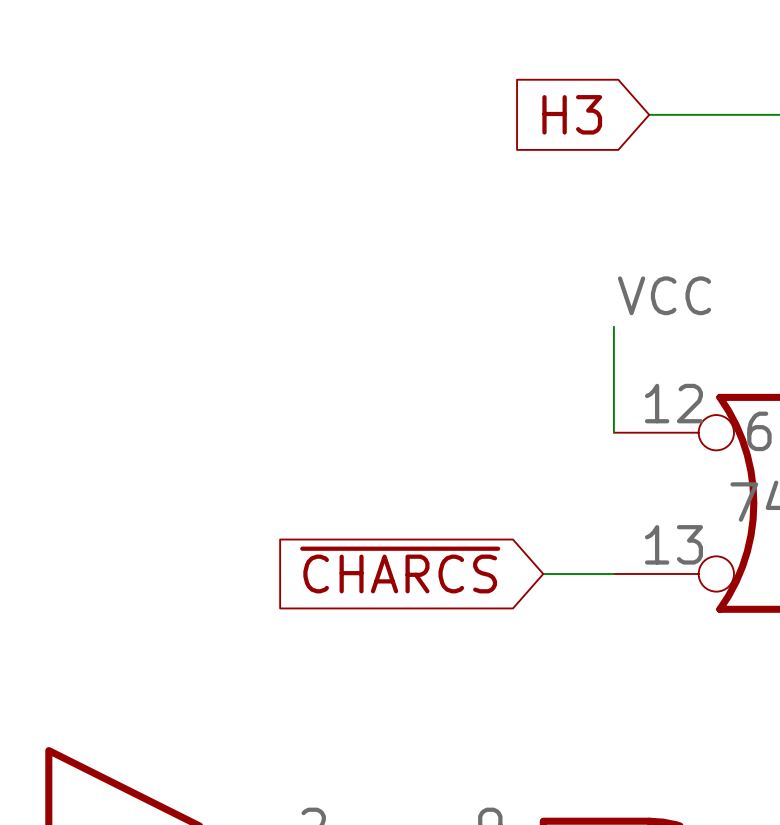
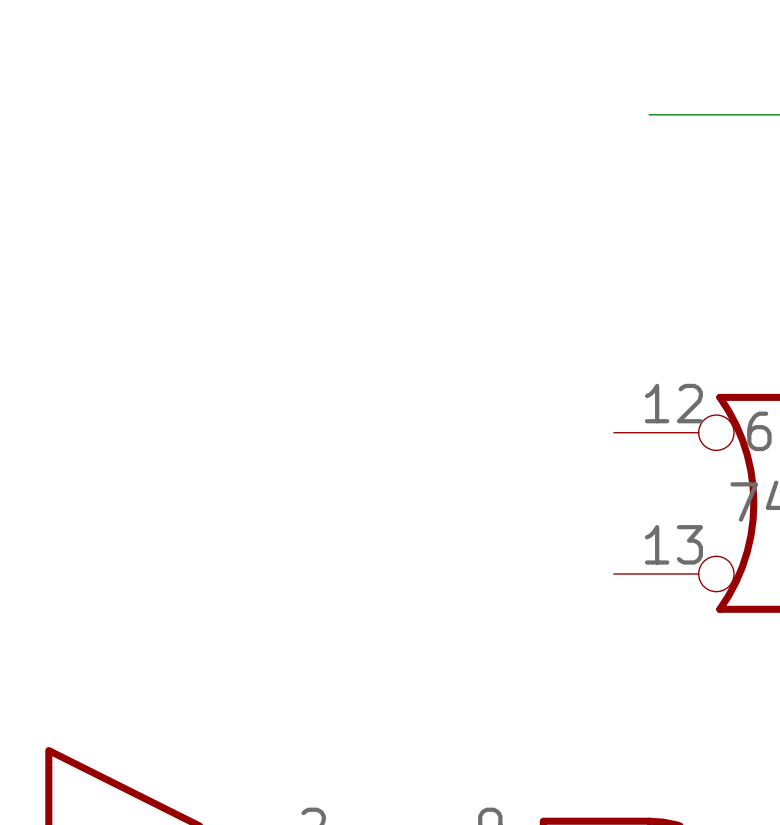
global label: H3 (572, 114) -> none
label: VCC (664, 295) -> none
wire: (613, 326) (613, 432) -> none
global label: ~{CHARCS} (400, 570) -> none
wire: (543, 573) (613, 573) -> none

